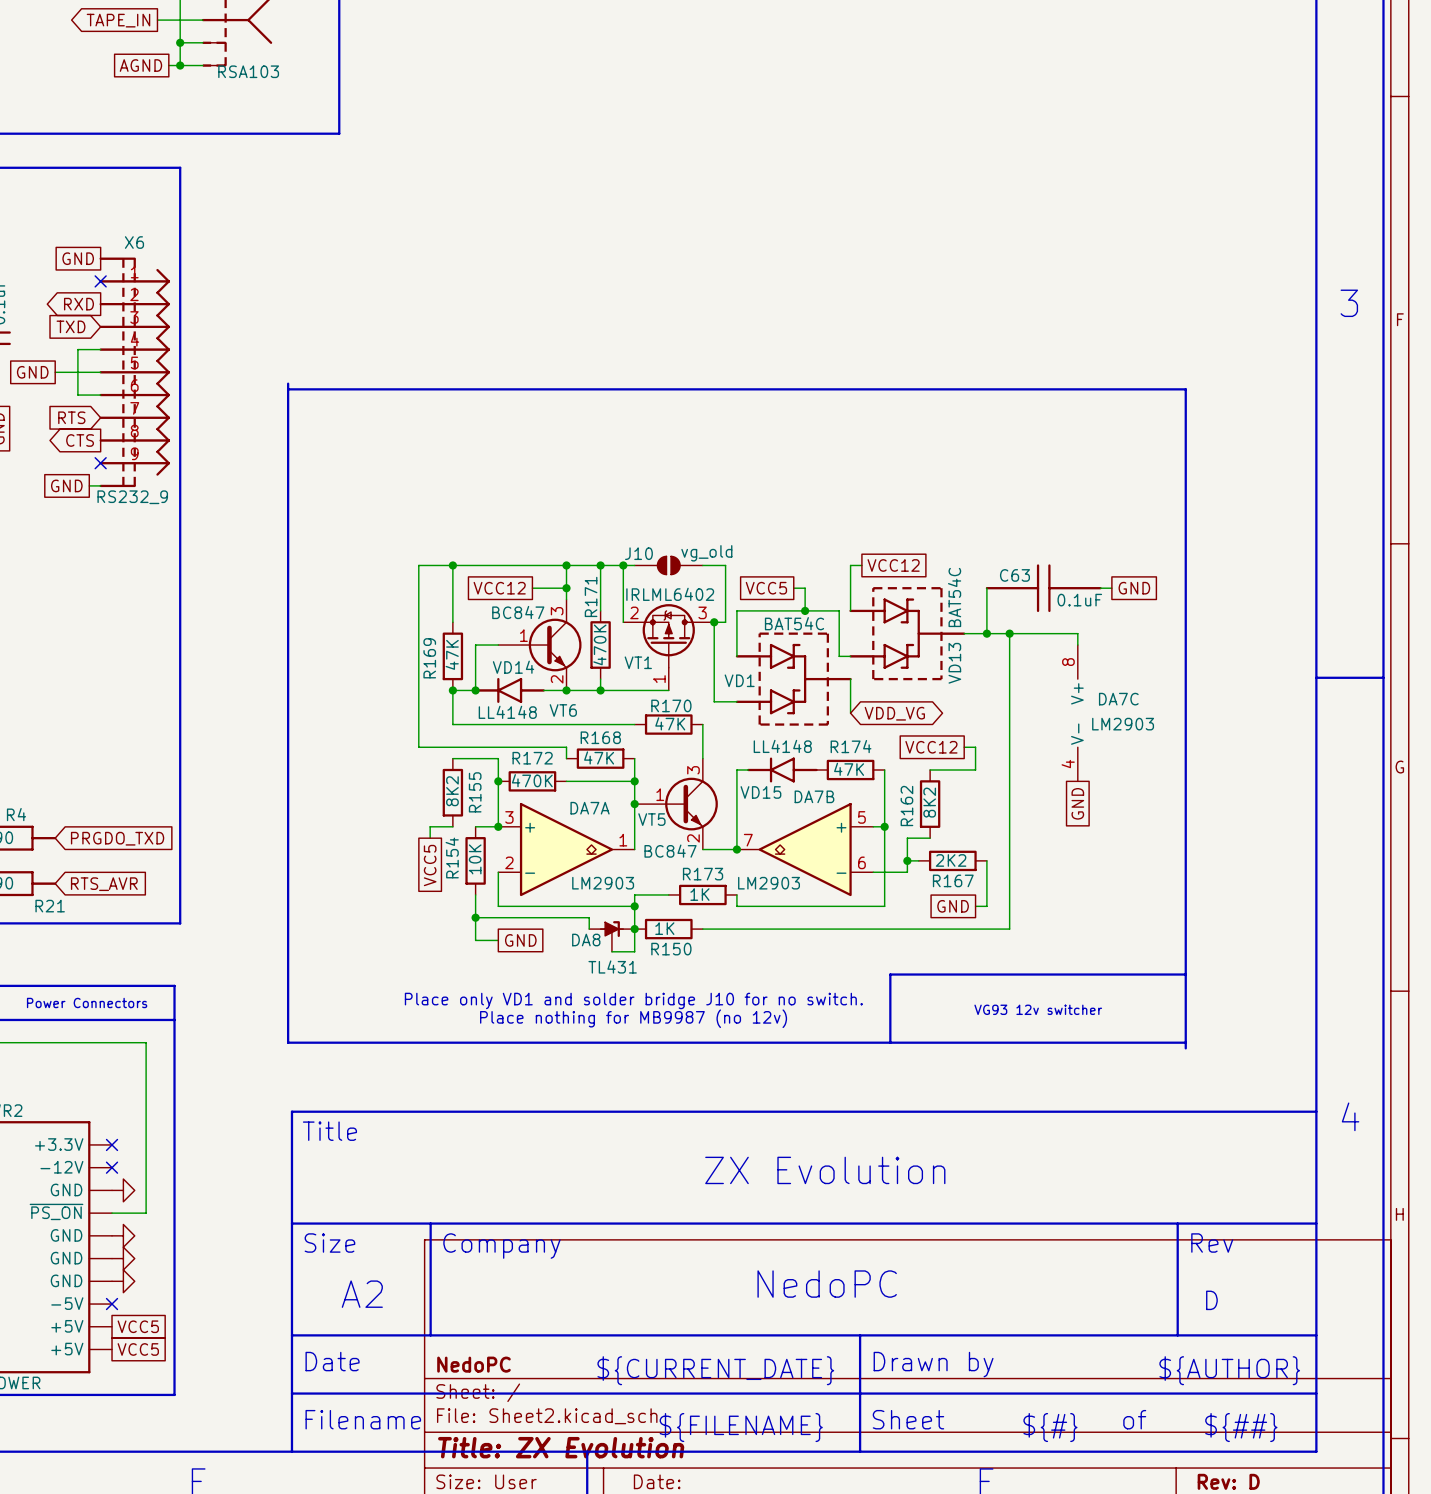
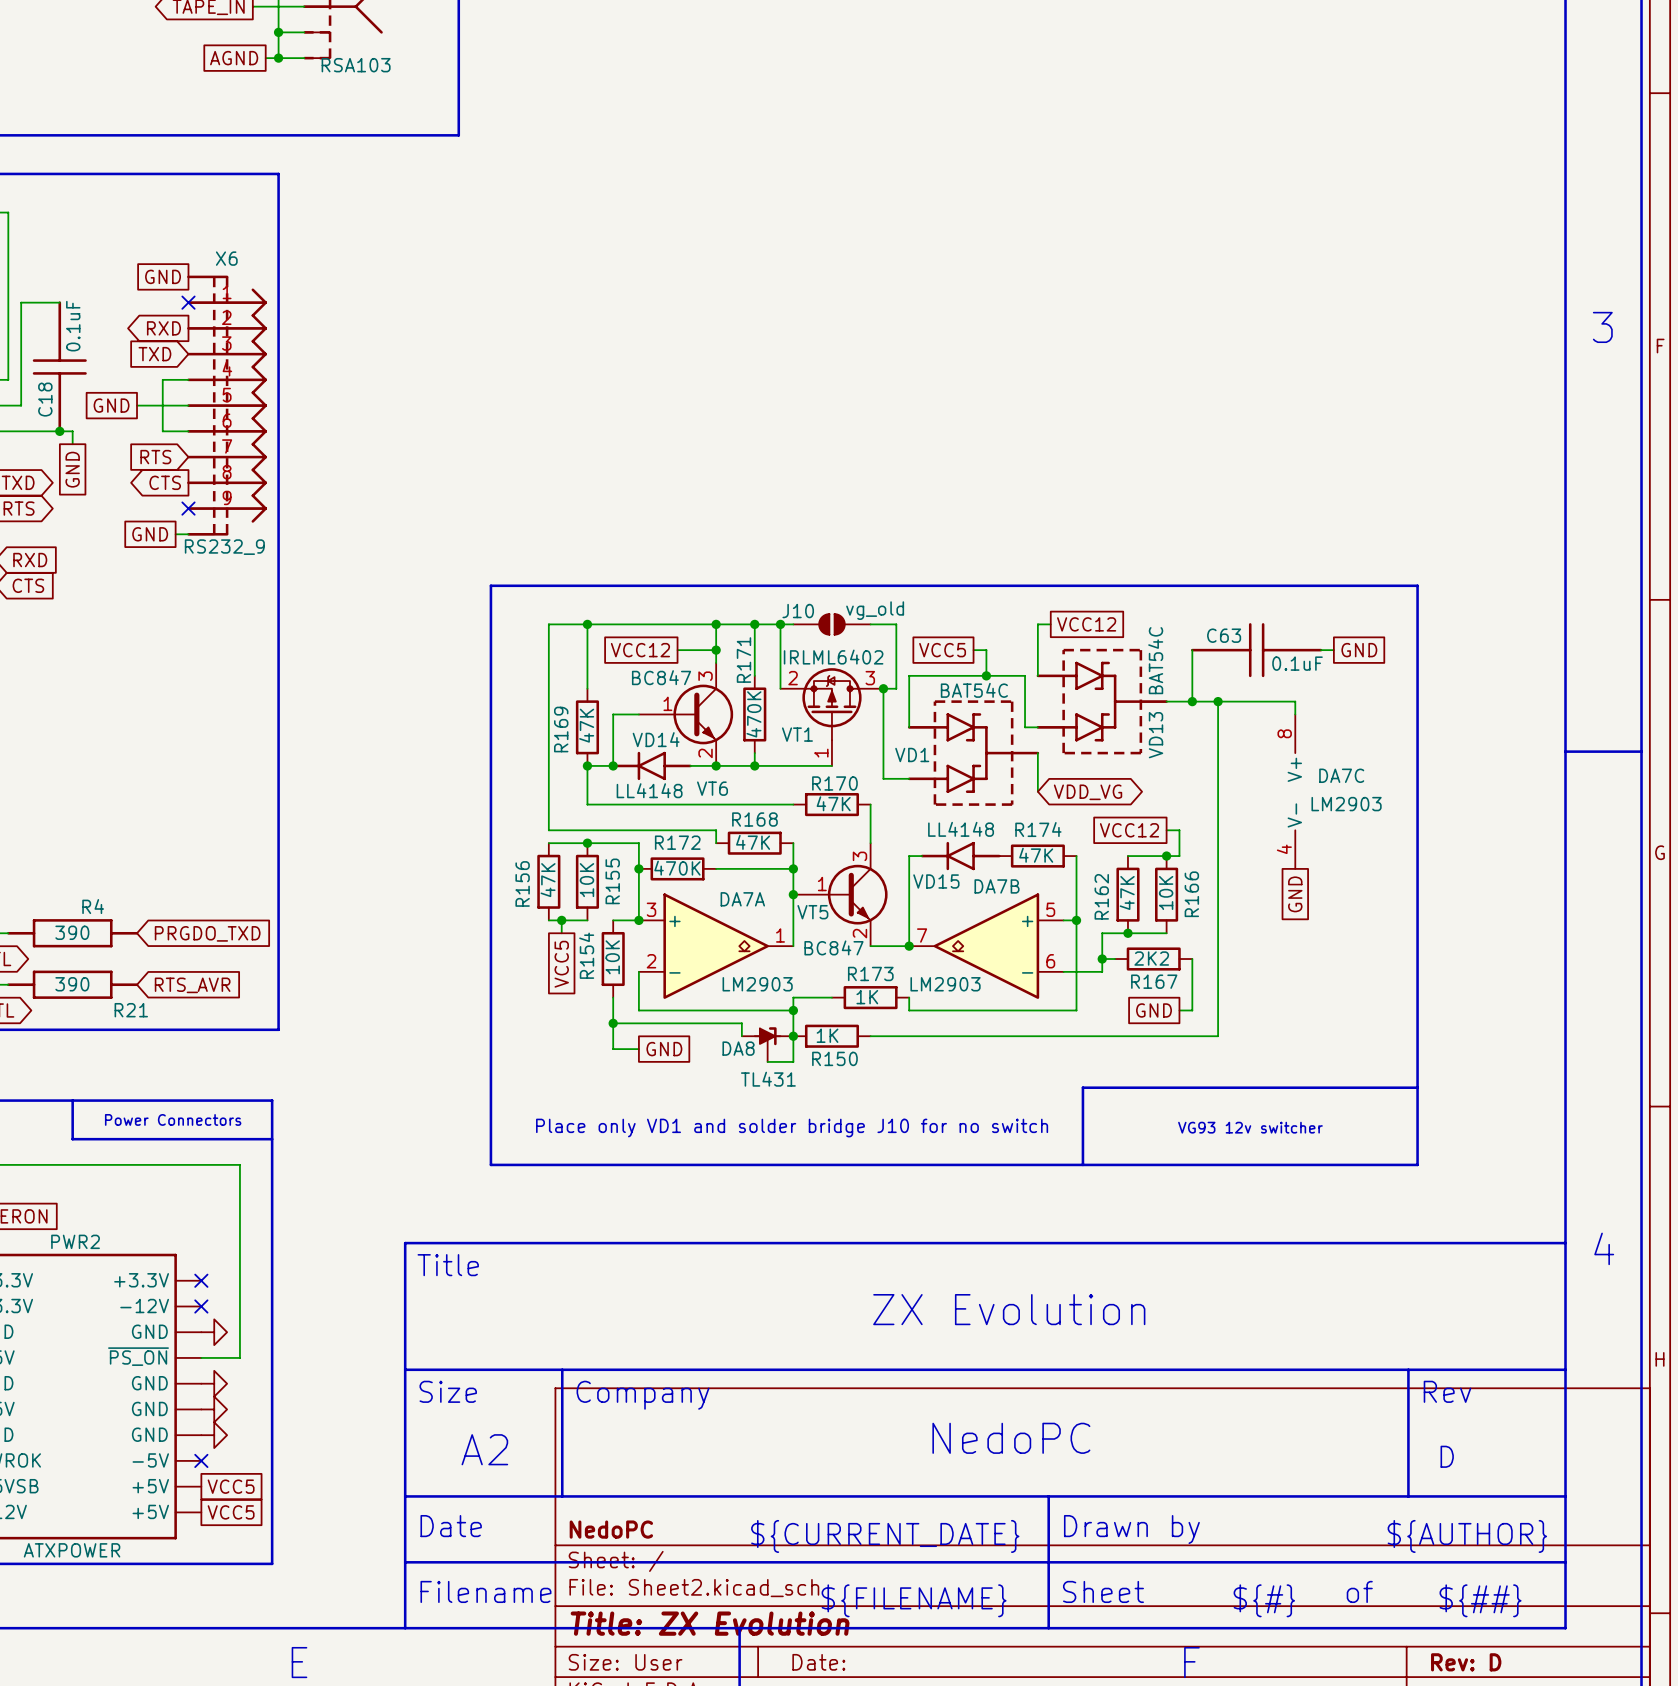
line: (288, 383) (288, 1042) (367, 1042) -> none
line: (288, 389) (1185, 389) (1185, 531) -> (490, 1164) (490, 585) (1417, 585)
wire: none -> (548, 843) (587, 843)
junction: none -> (587, 843)
junction: none -> (1166, 856)
R155 value: 8K2 (452, 791) -> 10K (586, 880)
R156: none -> 47K (548, 881)
R162 value: 8K2 (929, 802) -> 47K (1127, 892)
R166: none -> 10K (1166, 894)
wire: none -> (548, 920) (561, 920)
junction: none -> (561, 920)
wire: none -> (1127, 933) (1166, 933)
junction: none -> (1127, 933)
text: Place only VD1 and solder bridge J10 for no switch. (633, 1000) -> Place only VD1 and solder bridge J10 for no switch (792, 1128)
text: Place nothing for MB9987 (no 12v) (633, 1018) -> none
line: (1185, 1042) (1185, 1048) -> none

